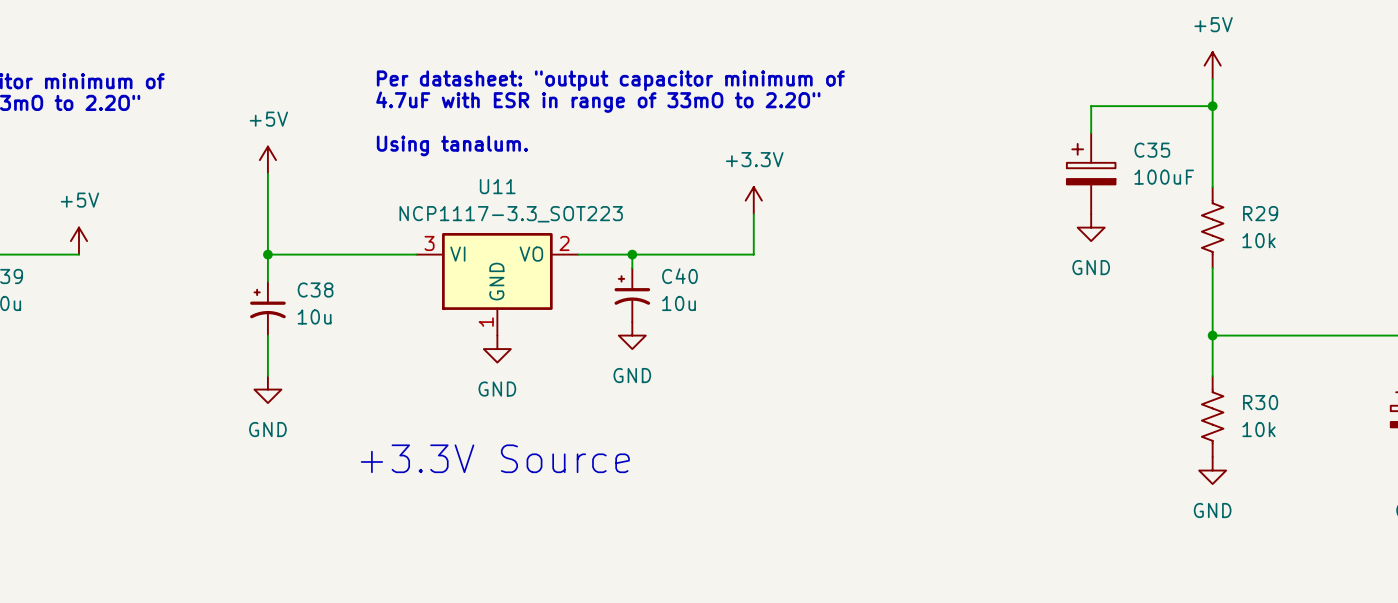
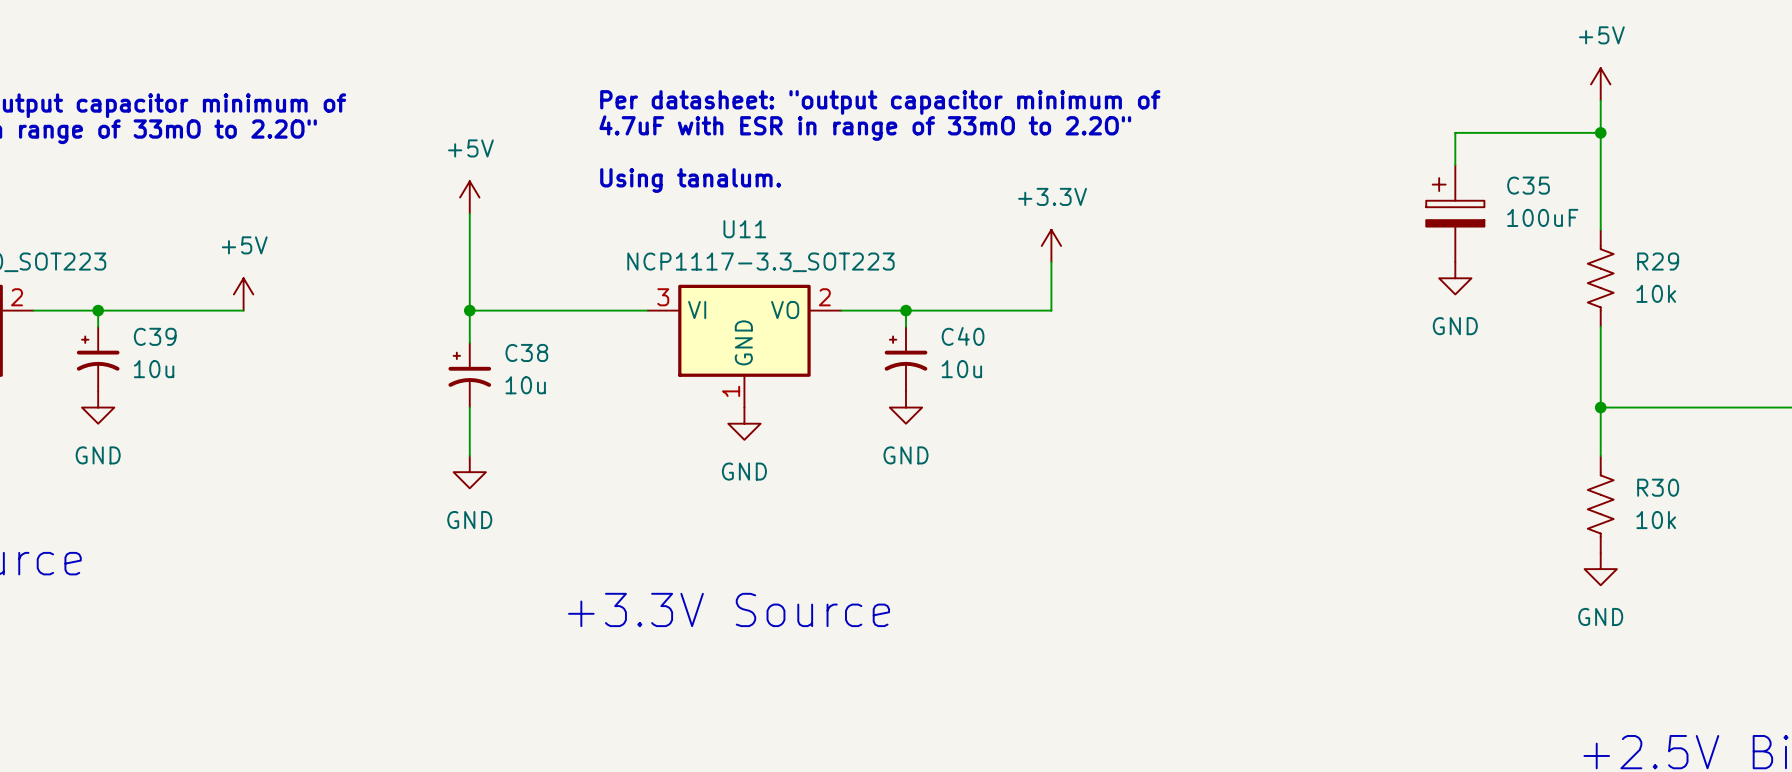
text position: +3.3V Source (495, 458) -> +3.3V Source (729, 609)

